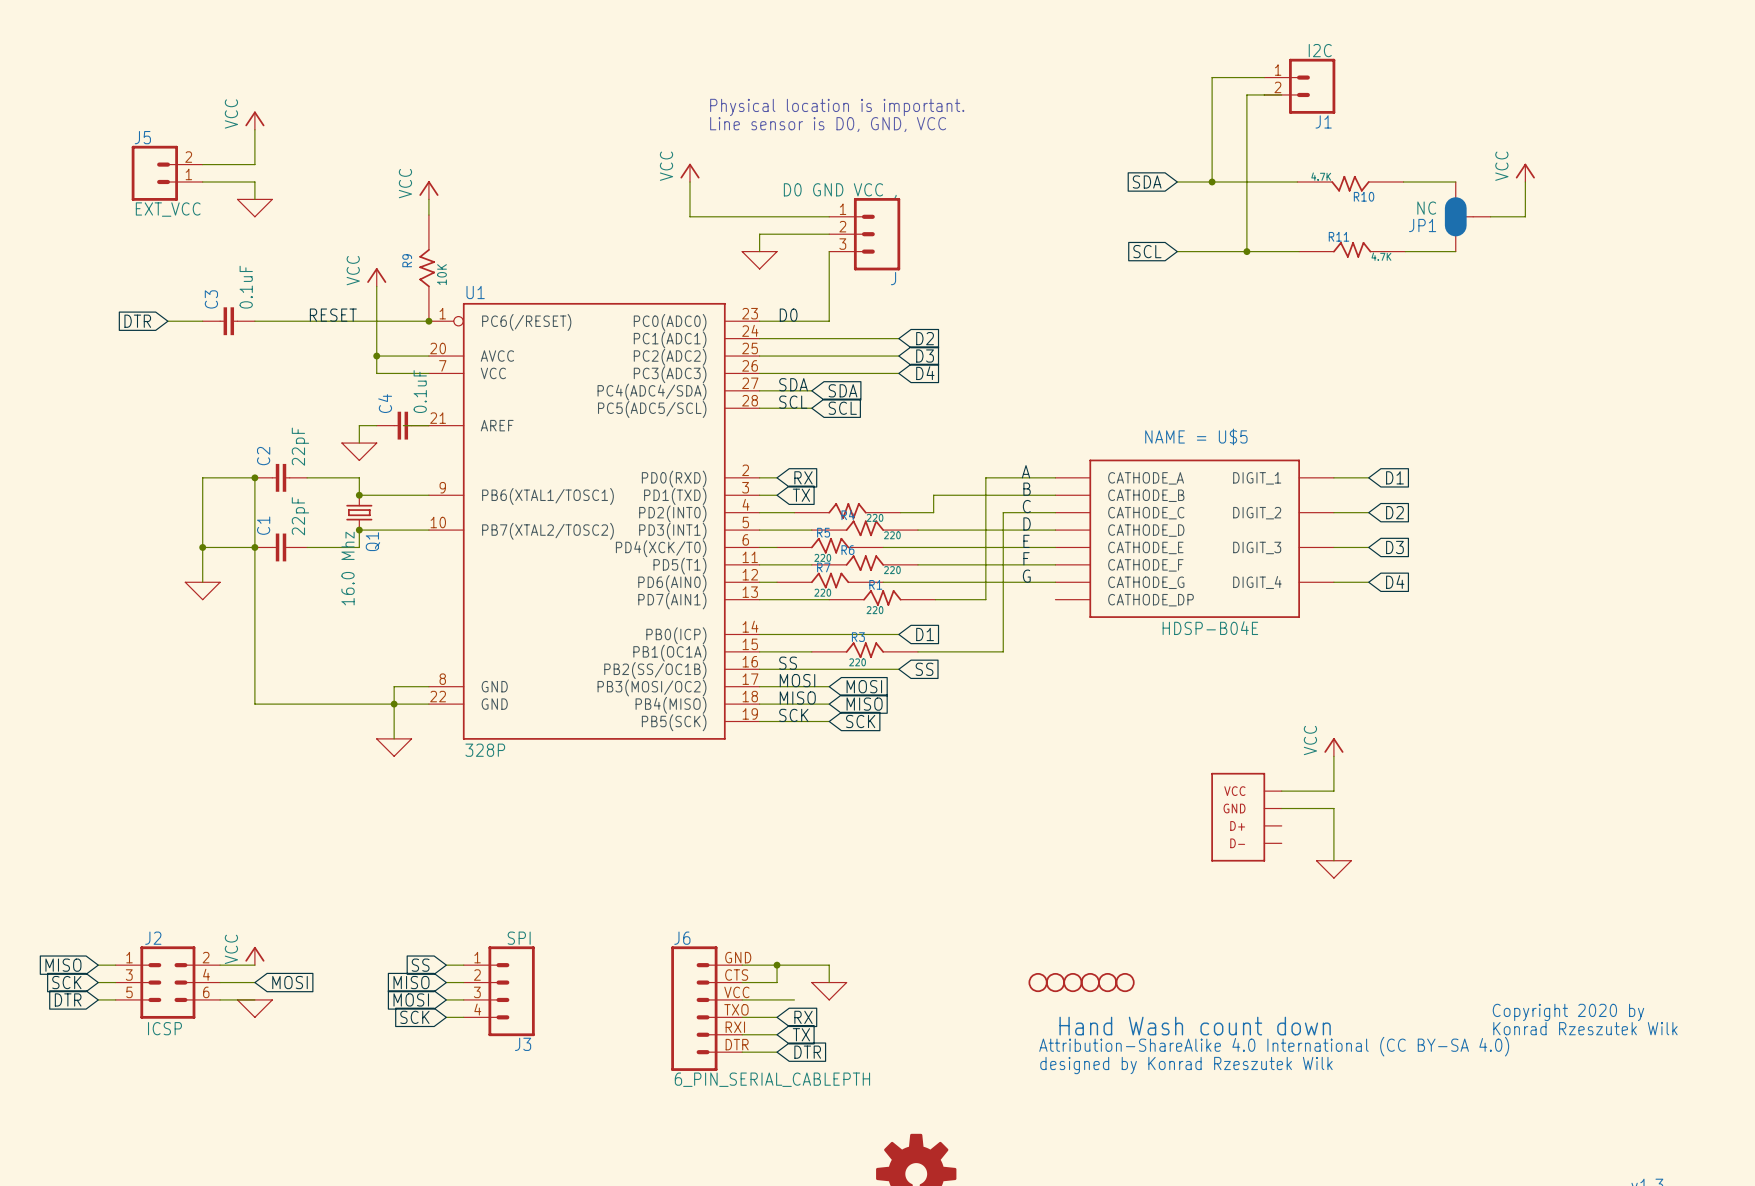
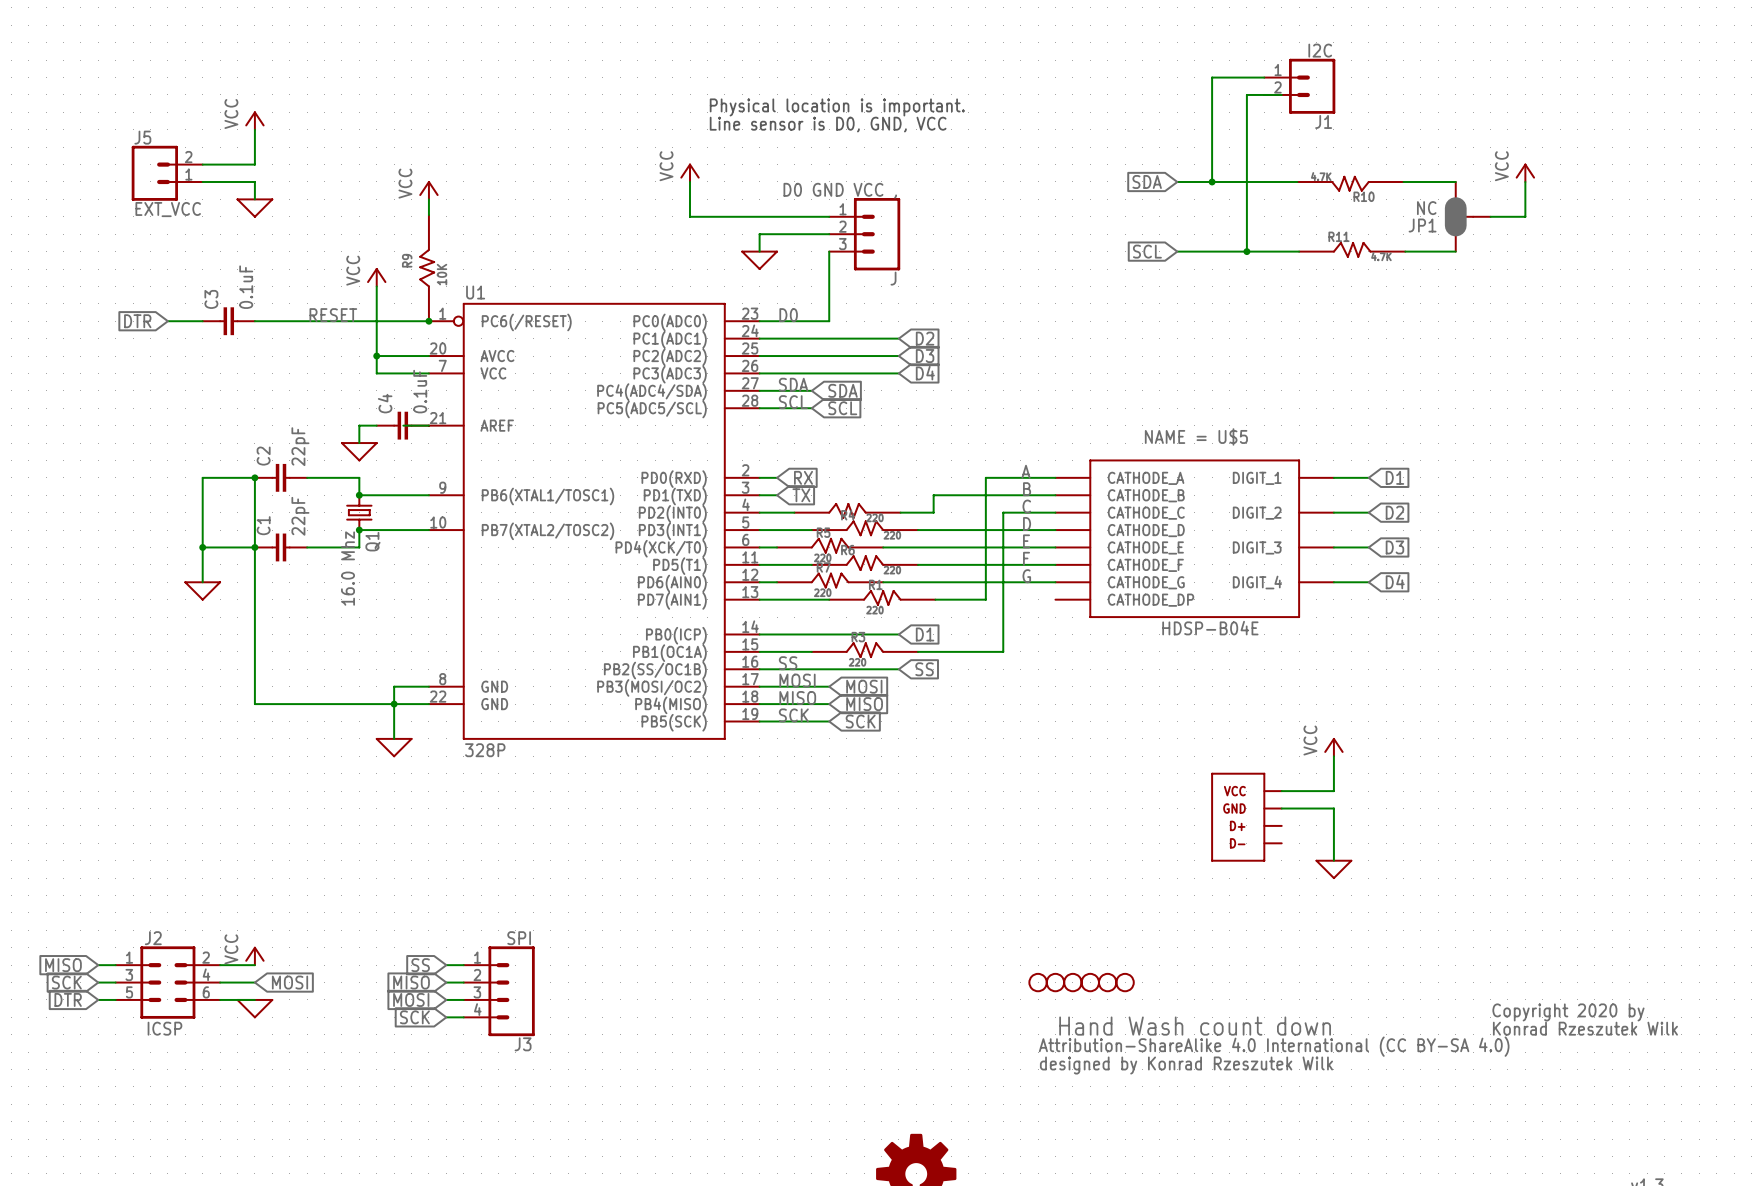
wire: (742, 965) (829, 965) (829, 982) -> none
wire: (777, 965) (777, 982) (742, 982) -> none
junction: (777, 965) -> none
power symbol: (829, 991) -> none
wire: (742, 999) (794, 999) -> none
J6: 6_PIN_SERIAL_CABLEPTH (706, 1008) -> none
wire: (742, 1017) (777, 1017) -> none
global label: RX (803, 1017) -> none
wire: (742, 1034) (777, 1034) -> none
global label: TX (801, 1034) -> none
wire: (742, 1052) (777, 1052) -> none
global label: DTR (807, 1052) -> none

